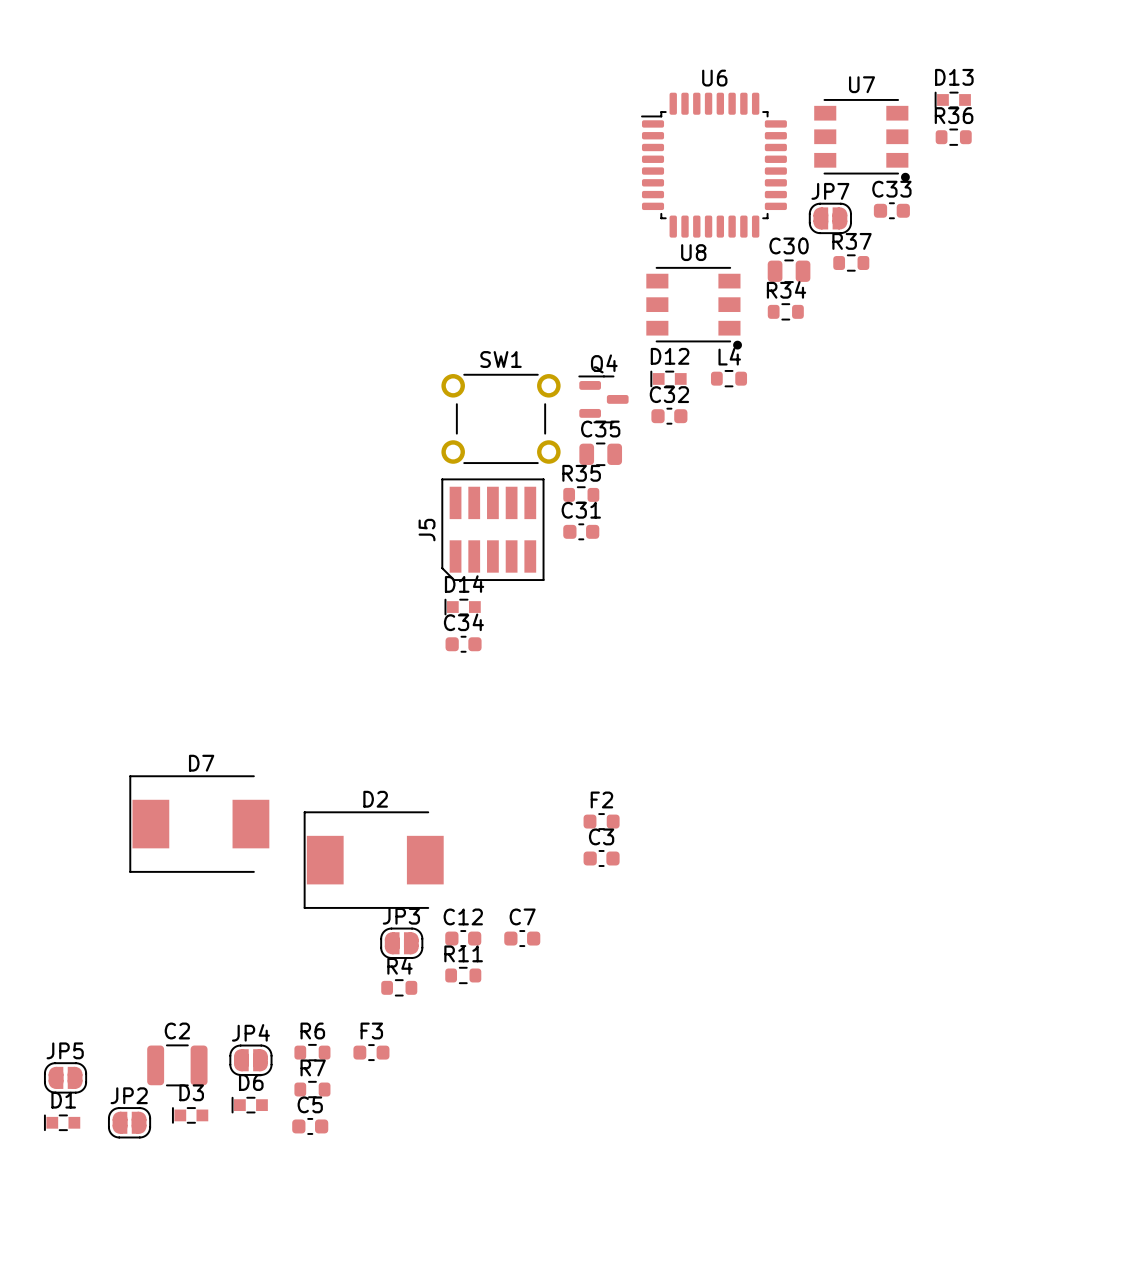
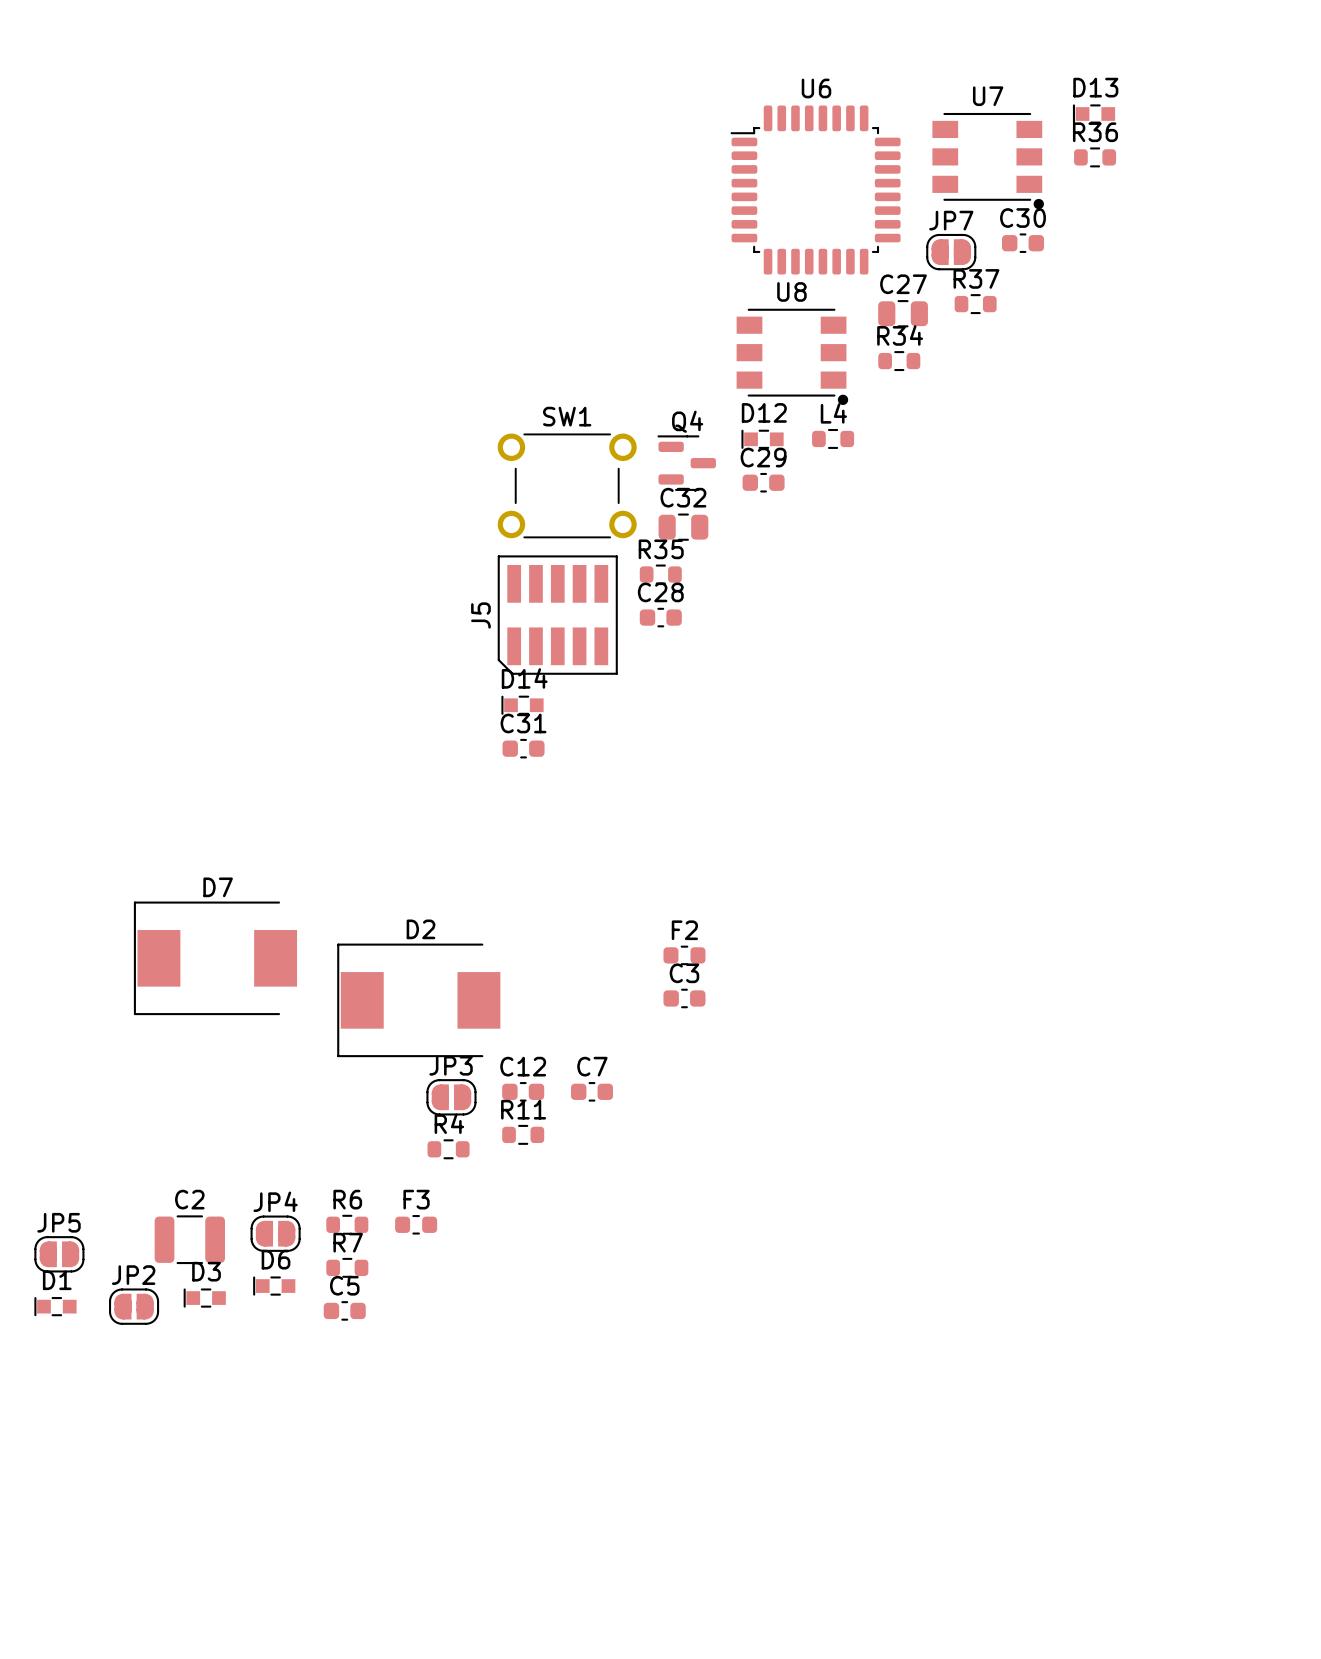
C33 name: C33 (891, 189) -> C30 (1022, 218)
C30 name: C30 (789, 245) -> C27 (903, 284)
C32 name: C32 (669, 394) -> C29 (763, 457)
C35 name: C35 (600, 429) -> C32 (683, 497)
C31 name: C31 (581, 510) -> C28 (660, 592)
C34 name: C34 (463, 622) -> C31 (523, 723)

